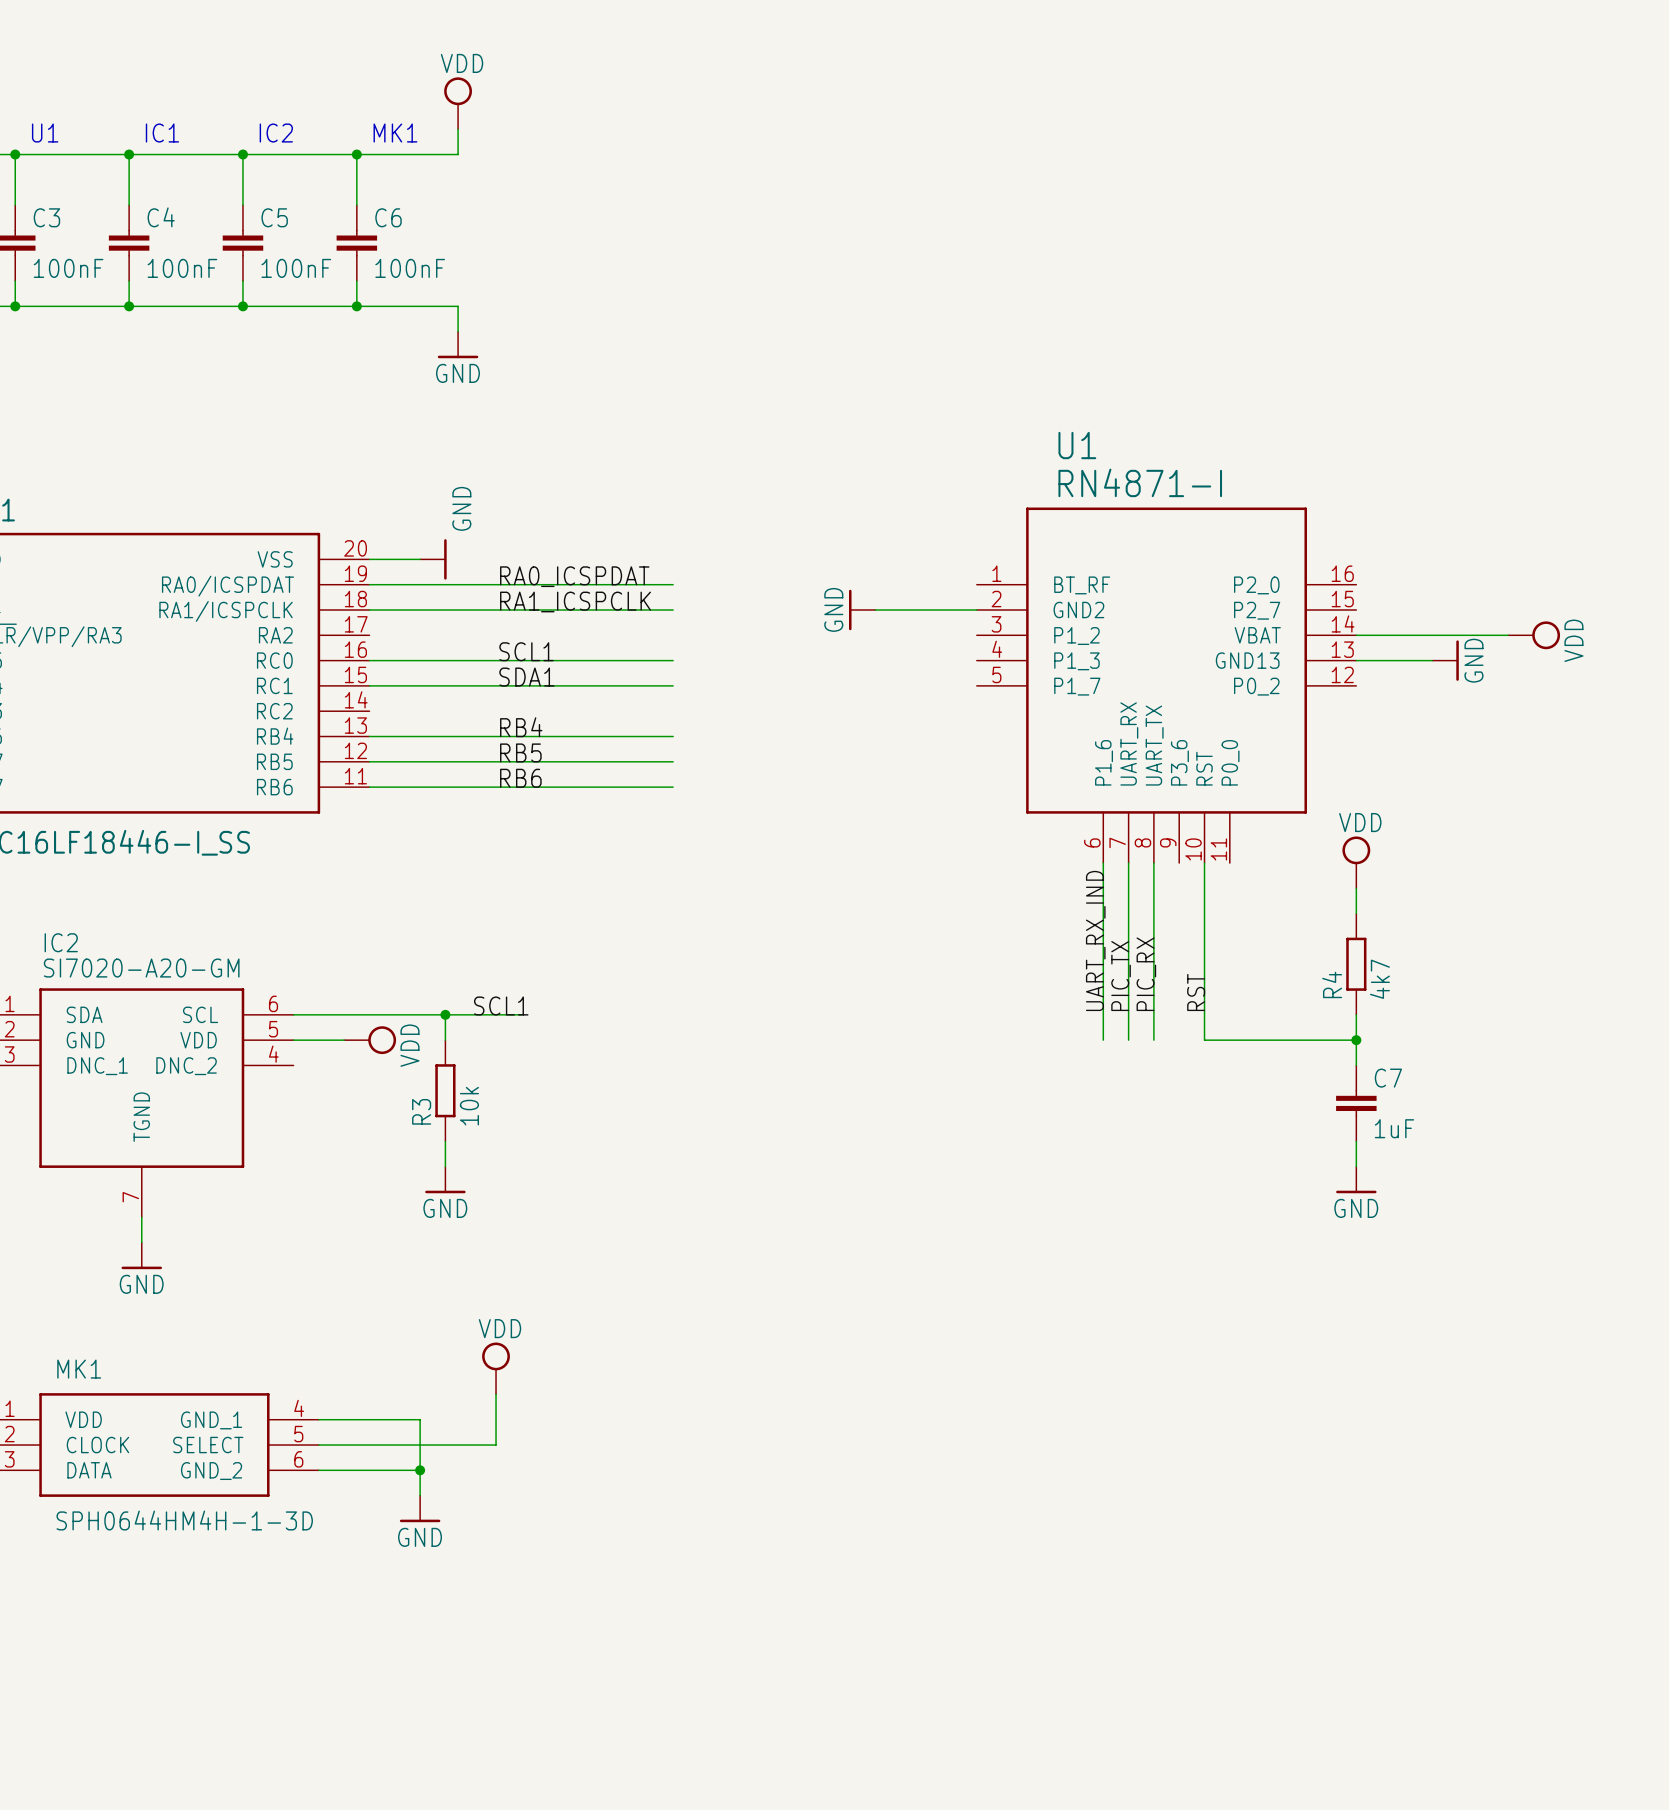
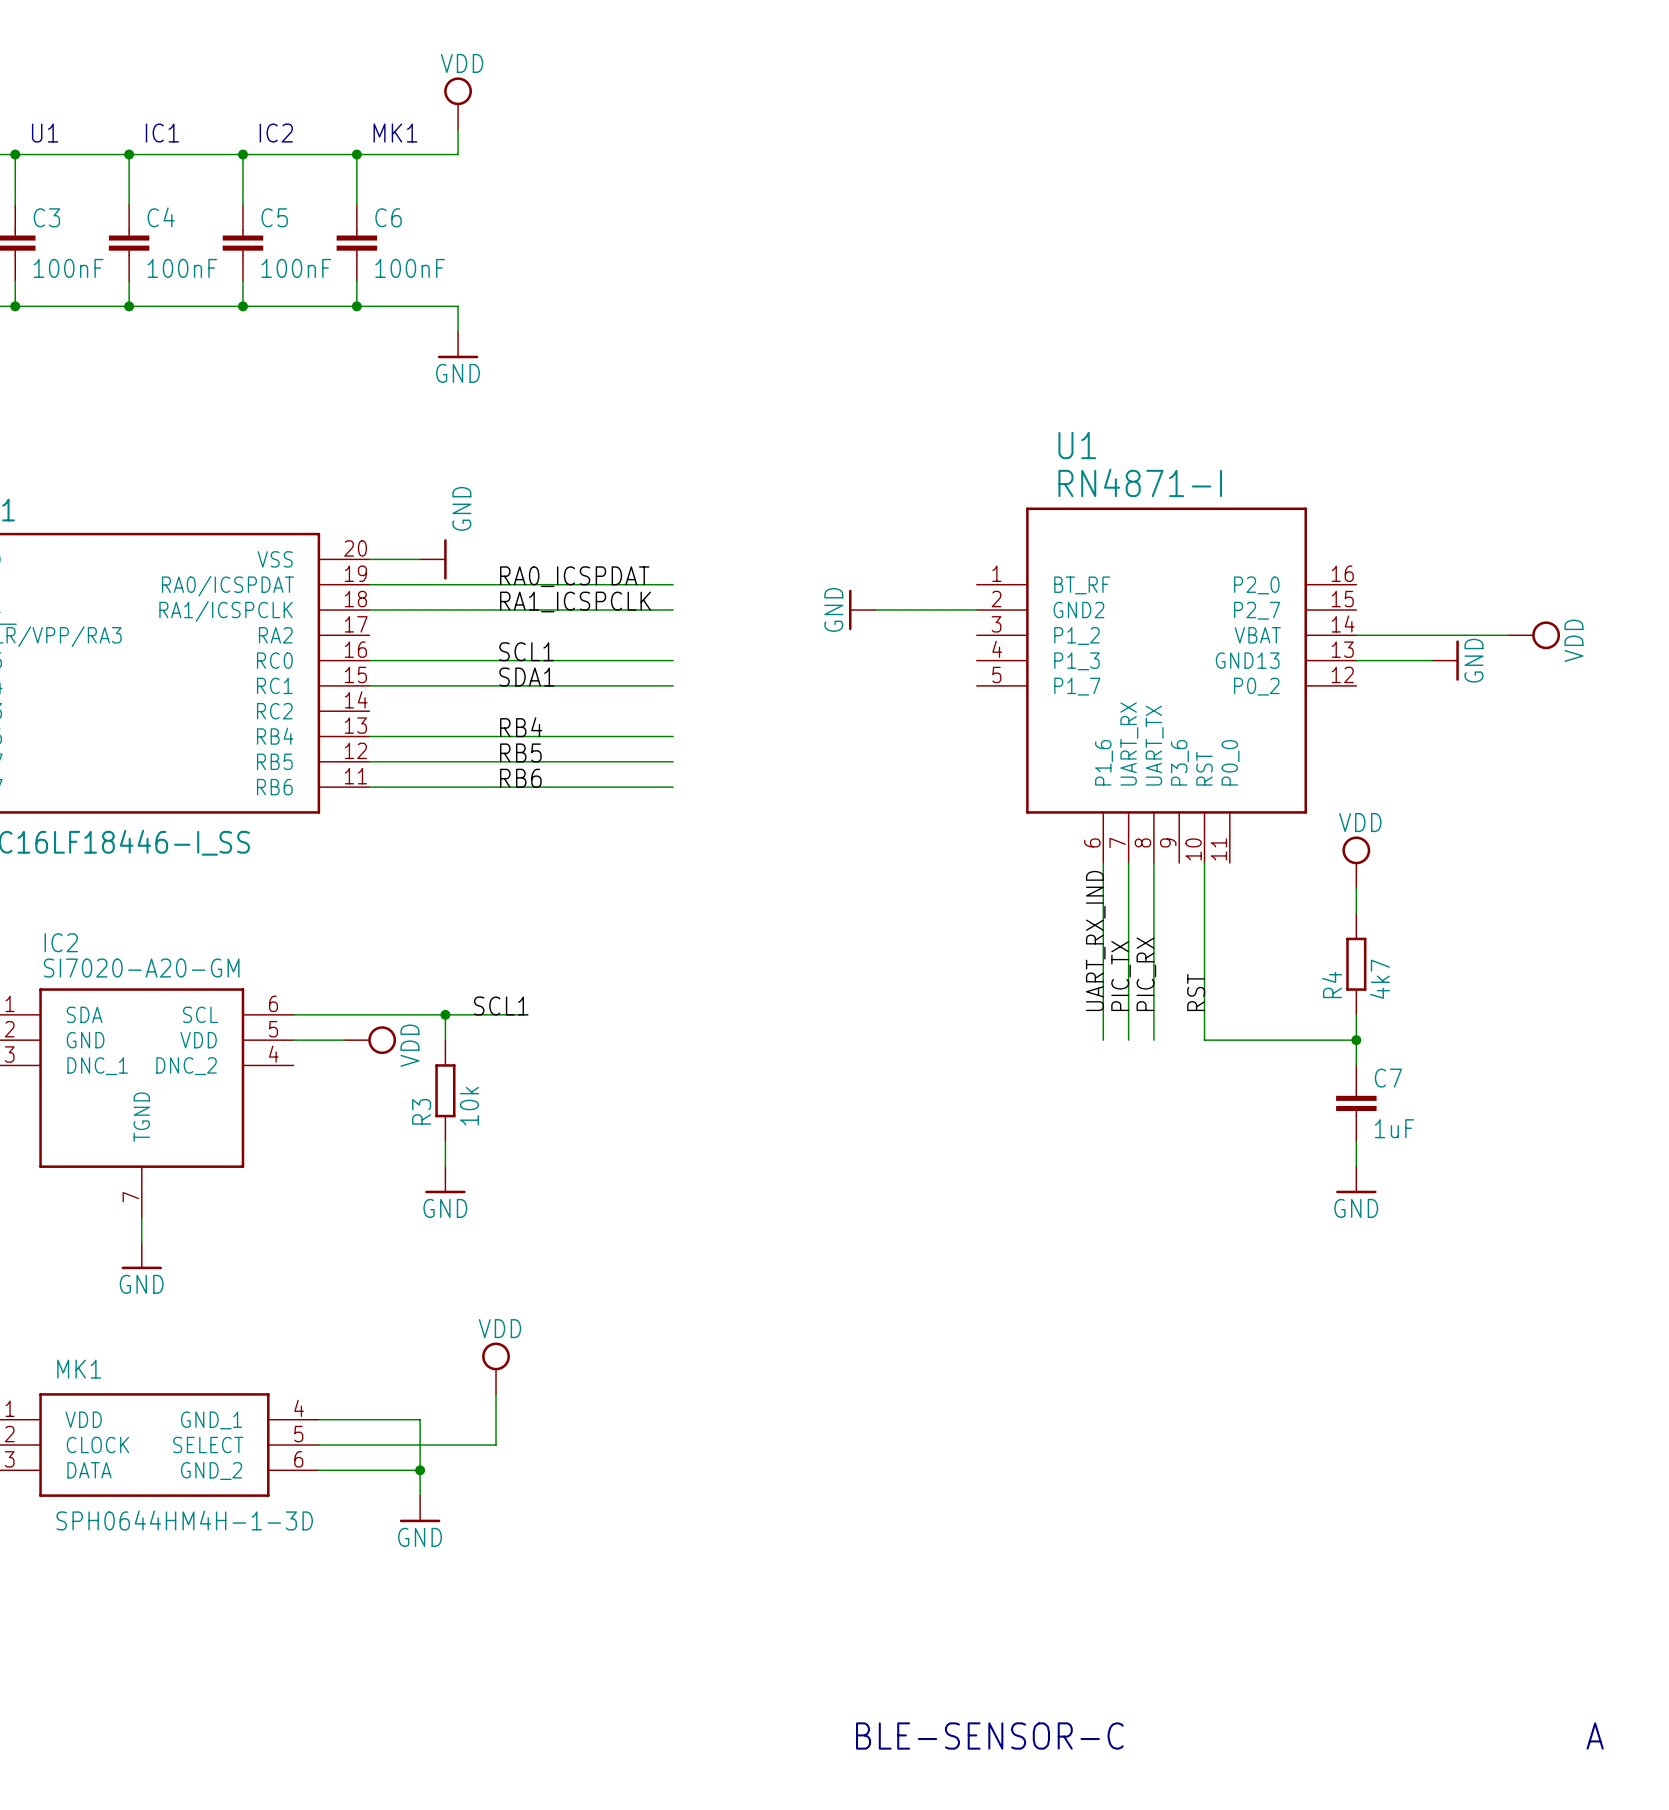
text: none -> BLE-SENSOR-C (989, 1736)
text: none -> A (1595, 1736)

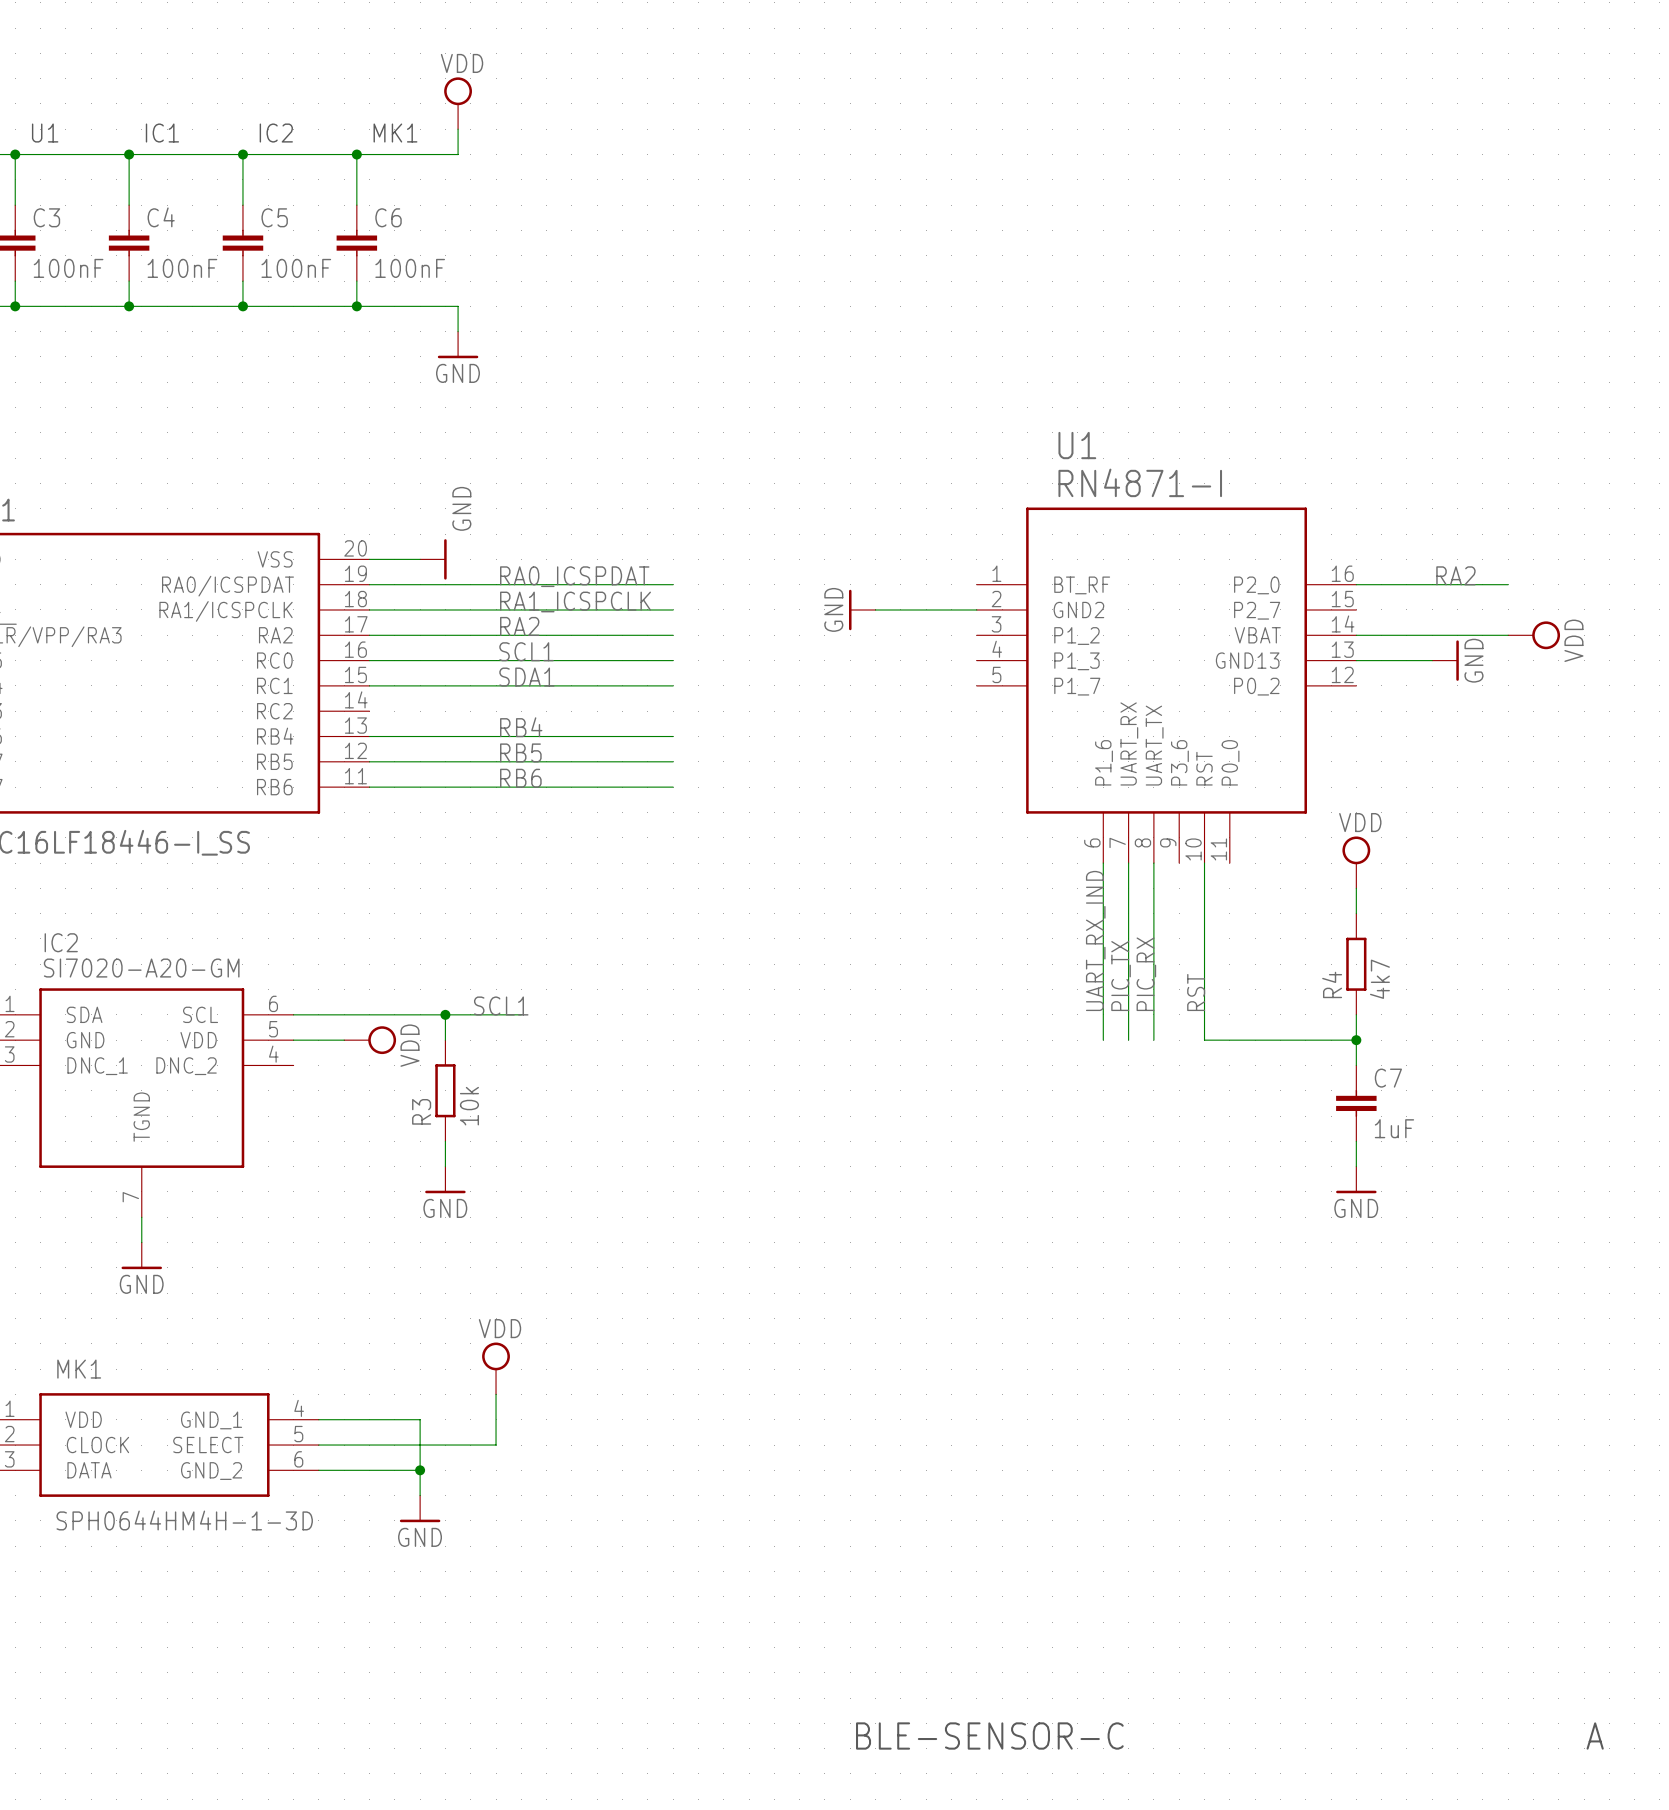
label: none -> RA2 (1455, 575)
wire: none -> (1356, 584) (1508, 584)
label: none -> RA2 (519, 626)
wire: none -> (369, 635) (673, 635)

